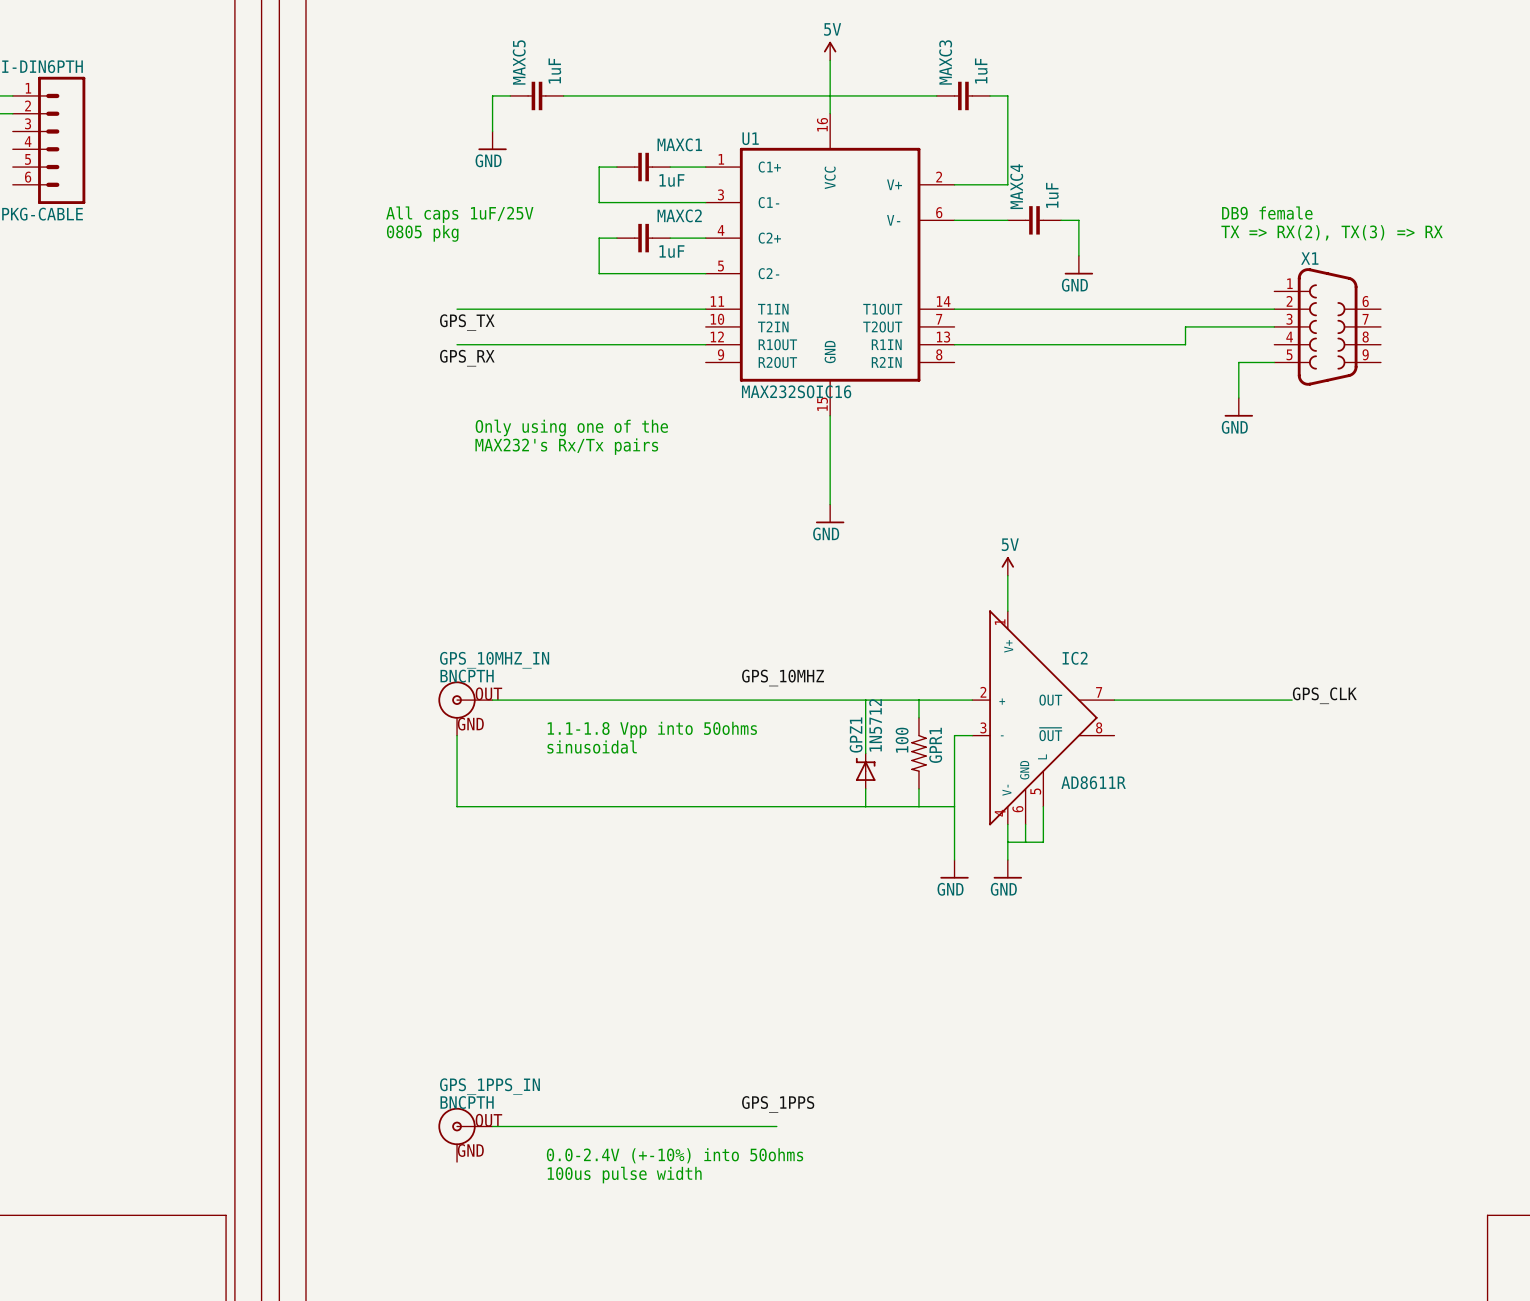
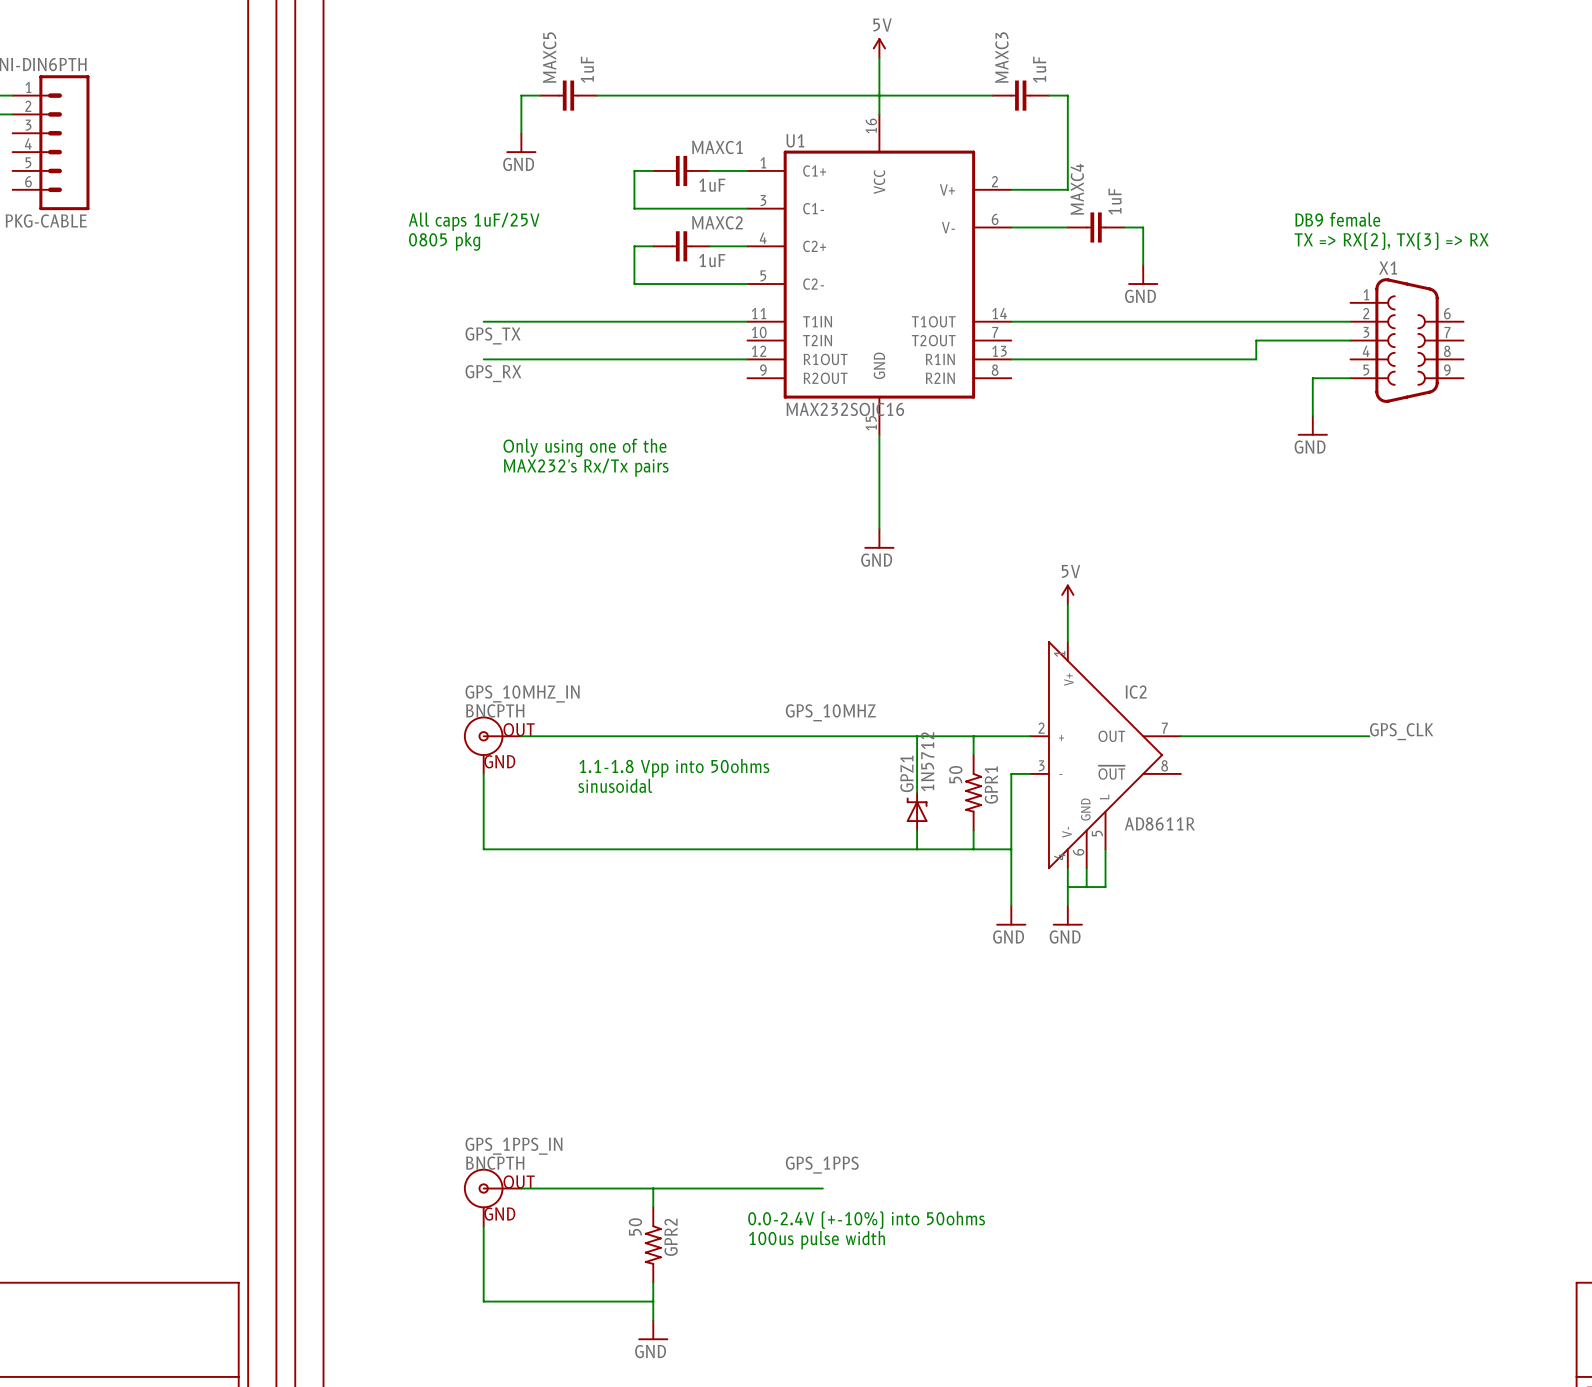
GPR1 value: 100 (902, 740) -> 50 (955, 774)
wire: none -> (653, 1188) (653, 1207)
text position: 0.0-2.4V (+-10%) into 50ohms (675, 1155) -> 0.0-2.4V (+-10%) into 50ohms (866, 1220)
wire: none -> (483, 1226) (483, 1301) (653, 1301)
text position: 100us pulse width (624, 1175) -> 100us pulse width (816, 1240)
GPR2: none -> 50 (653, 1245)
wire: none -> (653, 1282) (653, 1320)
power symbol: none -> GND (653, 1330)

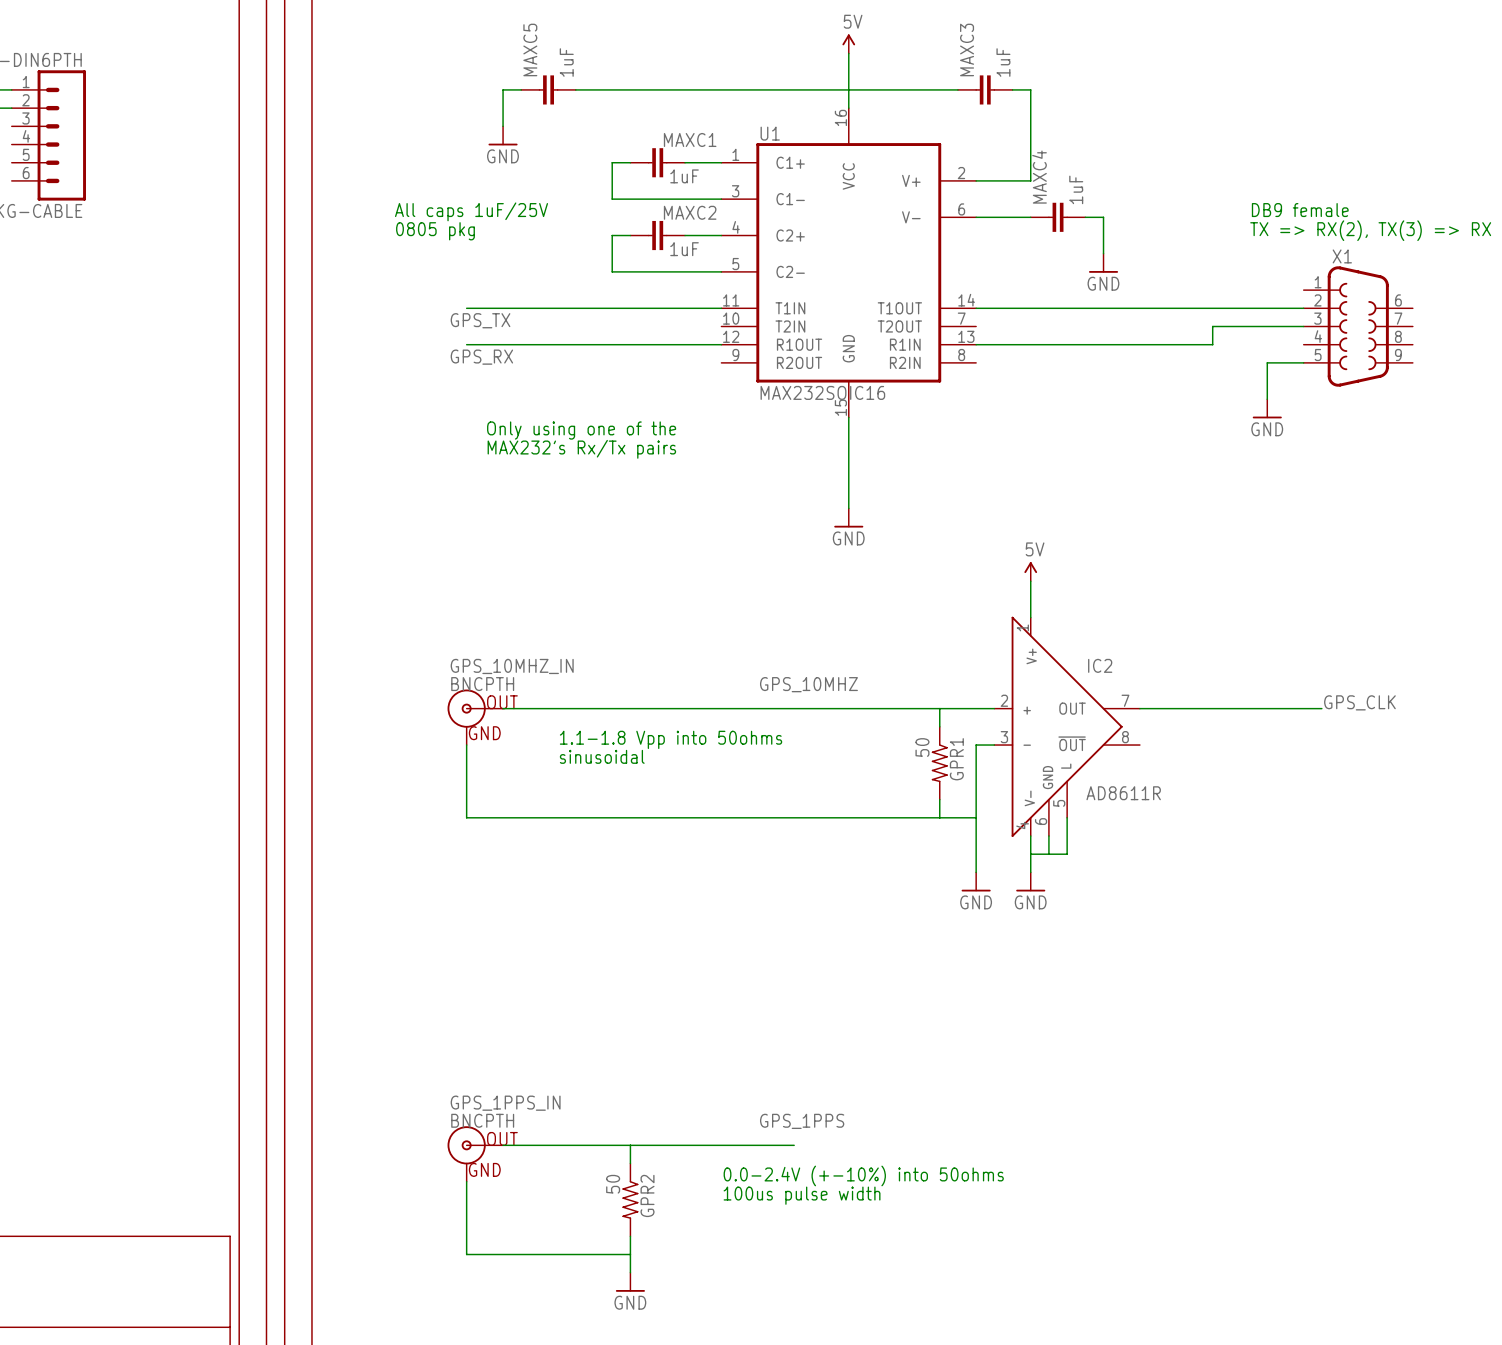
wire: (917, 736) (917, 792) -> none
GPZ1: 1N5712 (917, 811) -> none
wire: (917, 830) (917, 849) -> none

